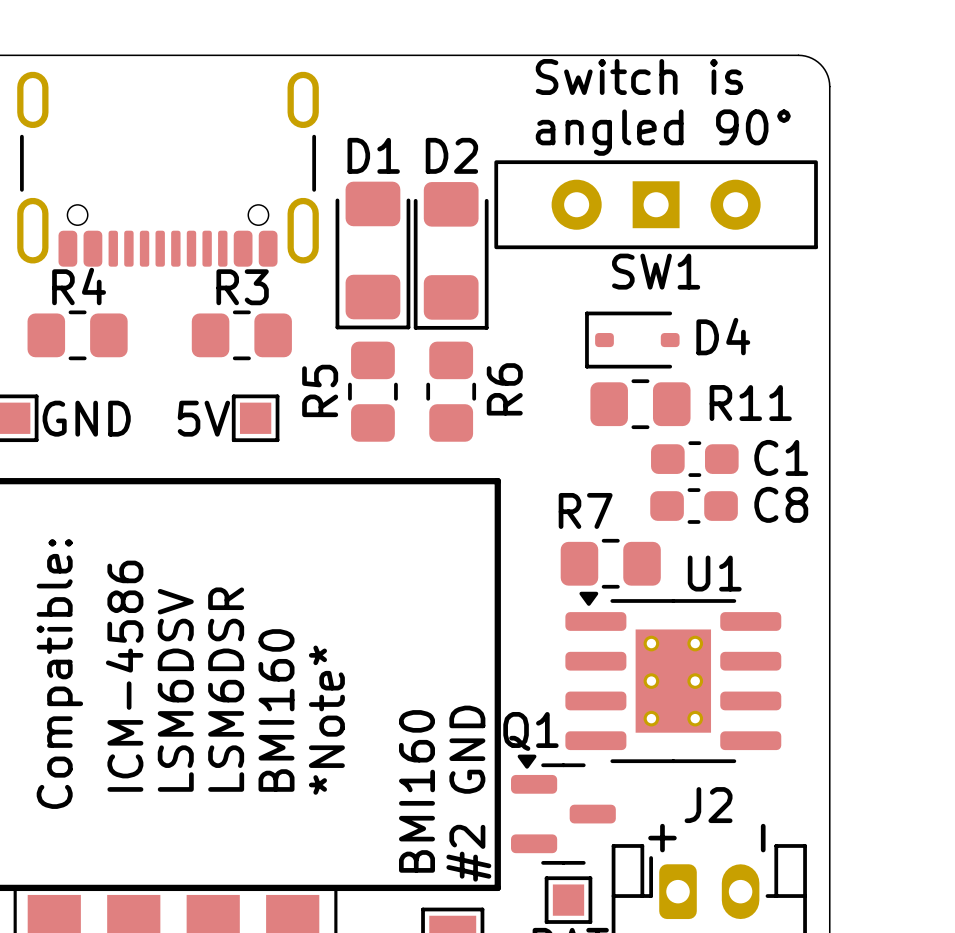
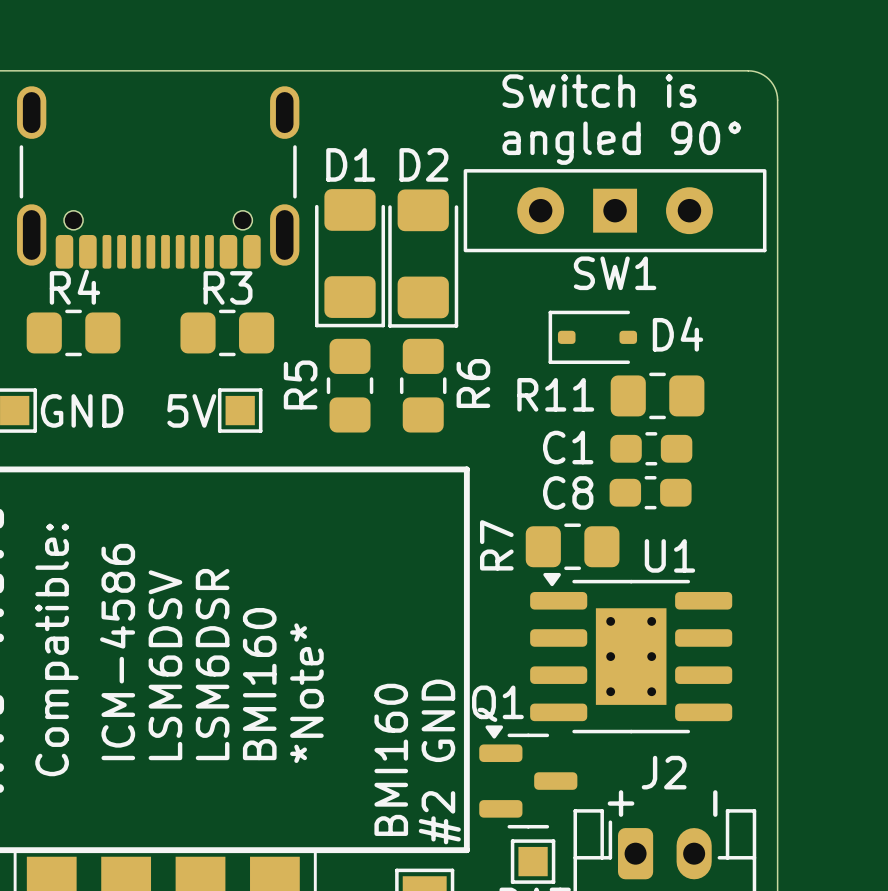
R11 name position: R11 (750, 403) -> R11 (555, 394)
R11 position: (640, 404) -> (657, 395)
C1 name position: C1 (781, 457) -> C1 (568, 447)
C8 name position: C8 (781, 504) -> C8 (568, 492)
R7 name rotation: 0° (585, 510) -> 90° counterclockwise (496, 545)

